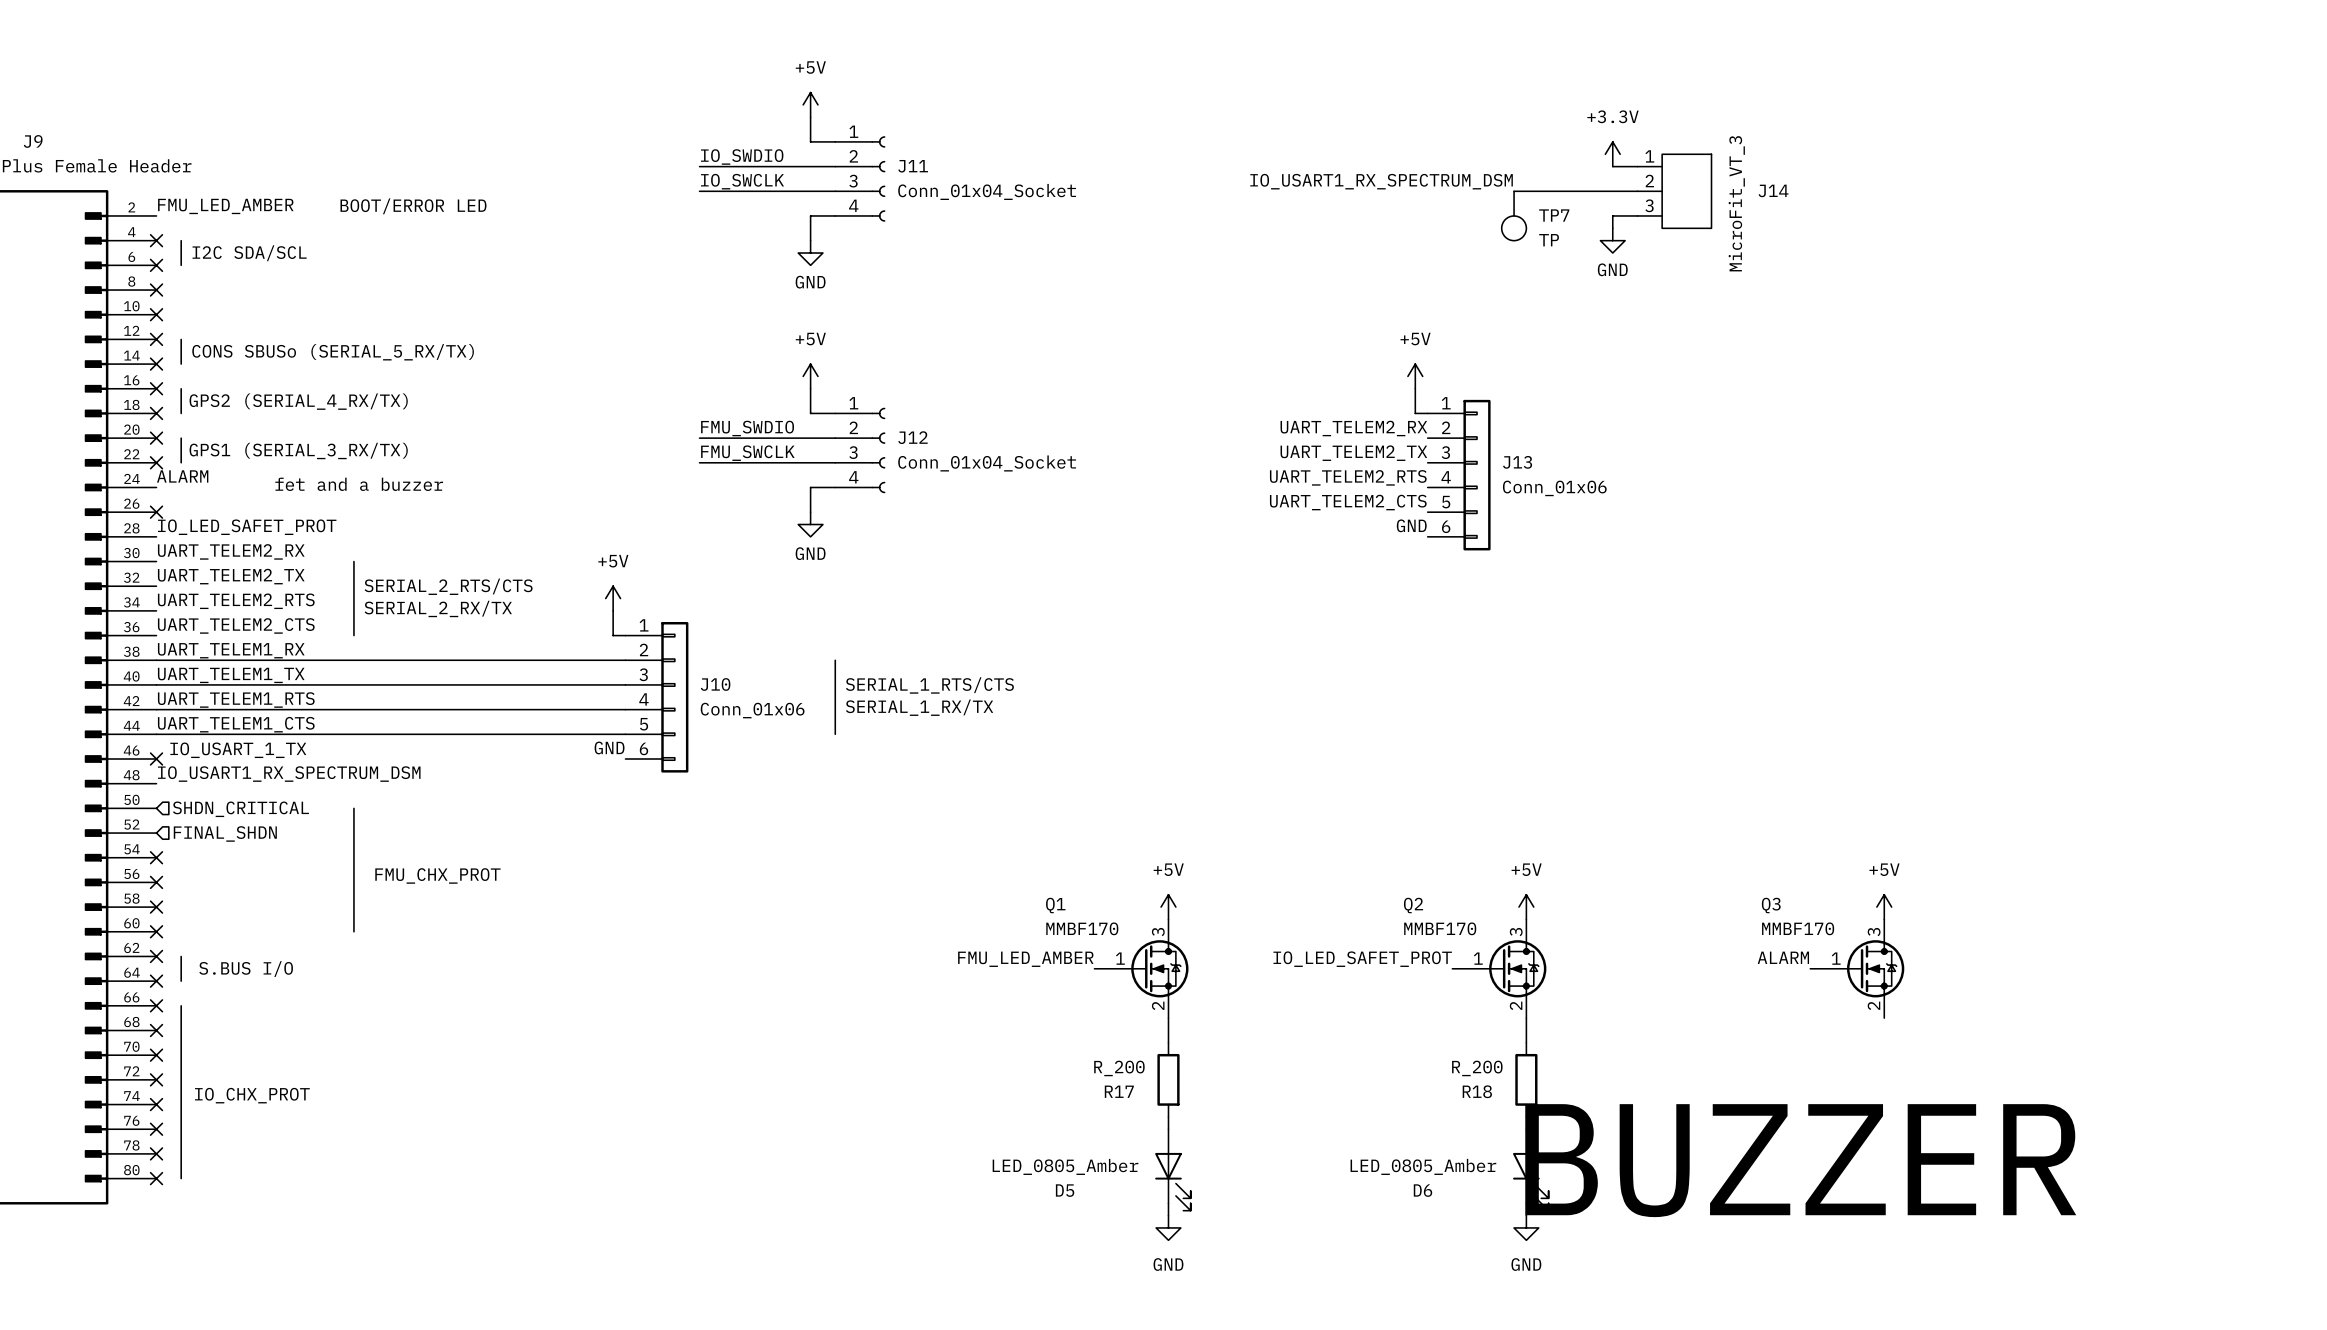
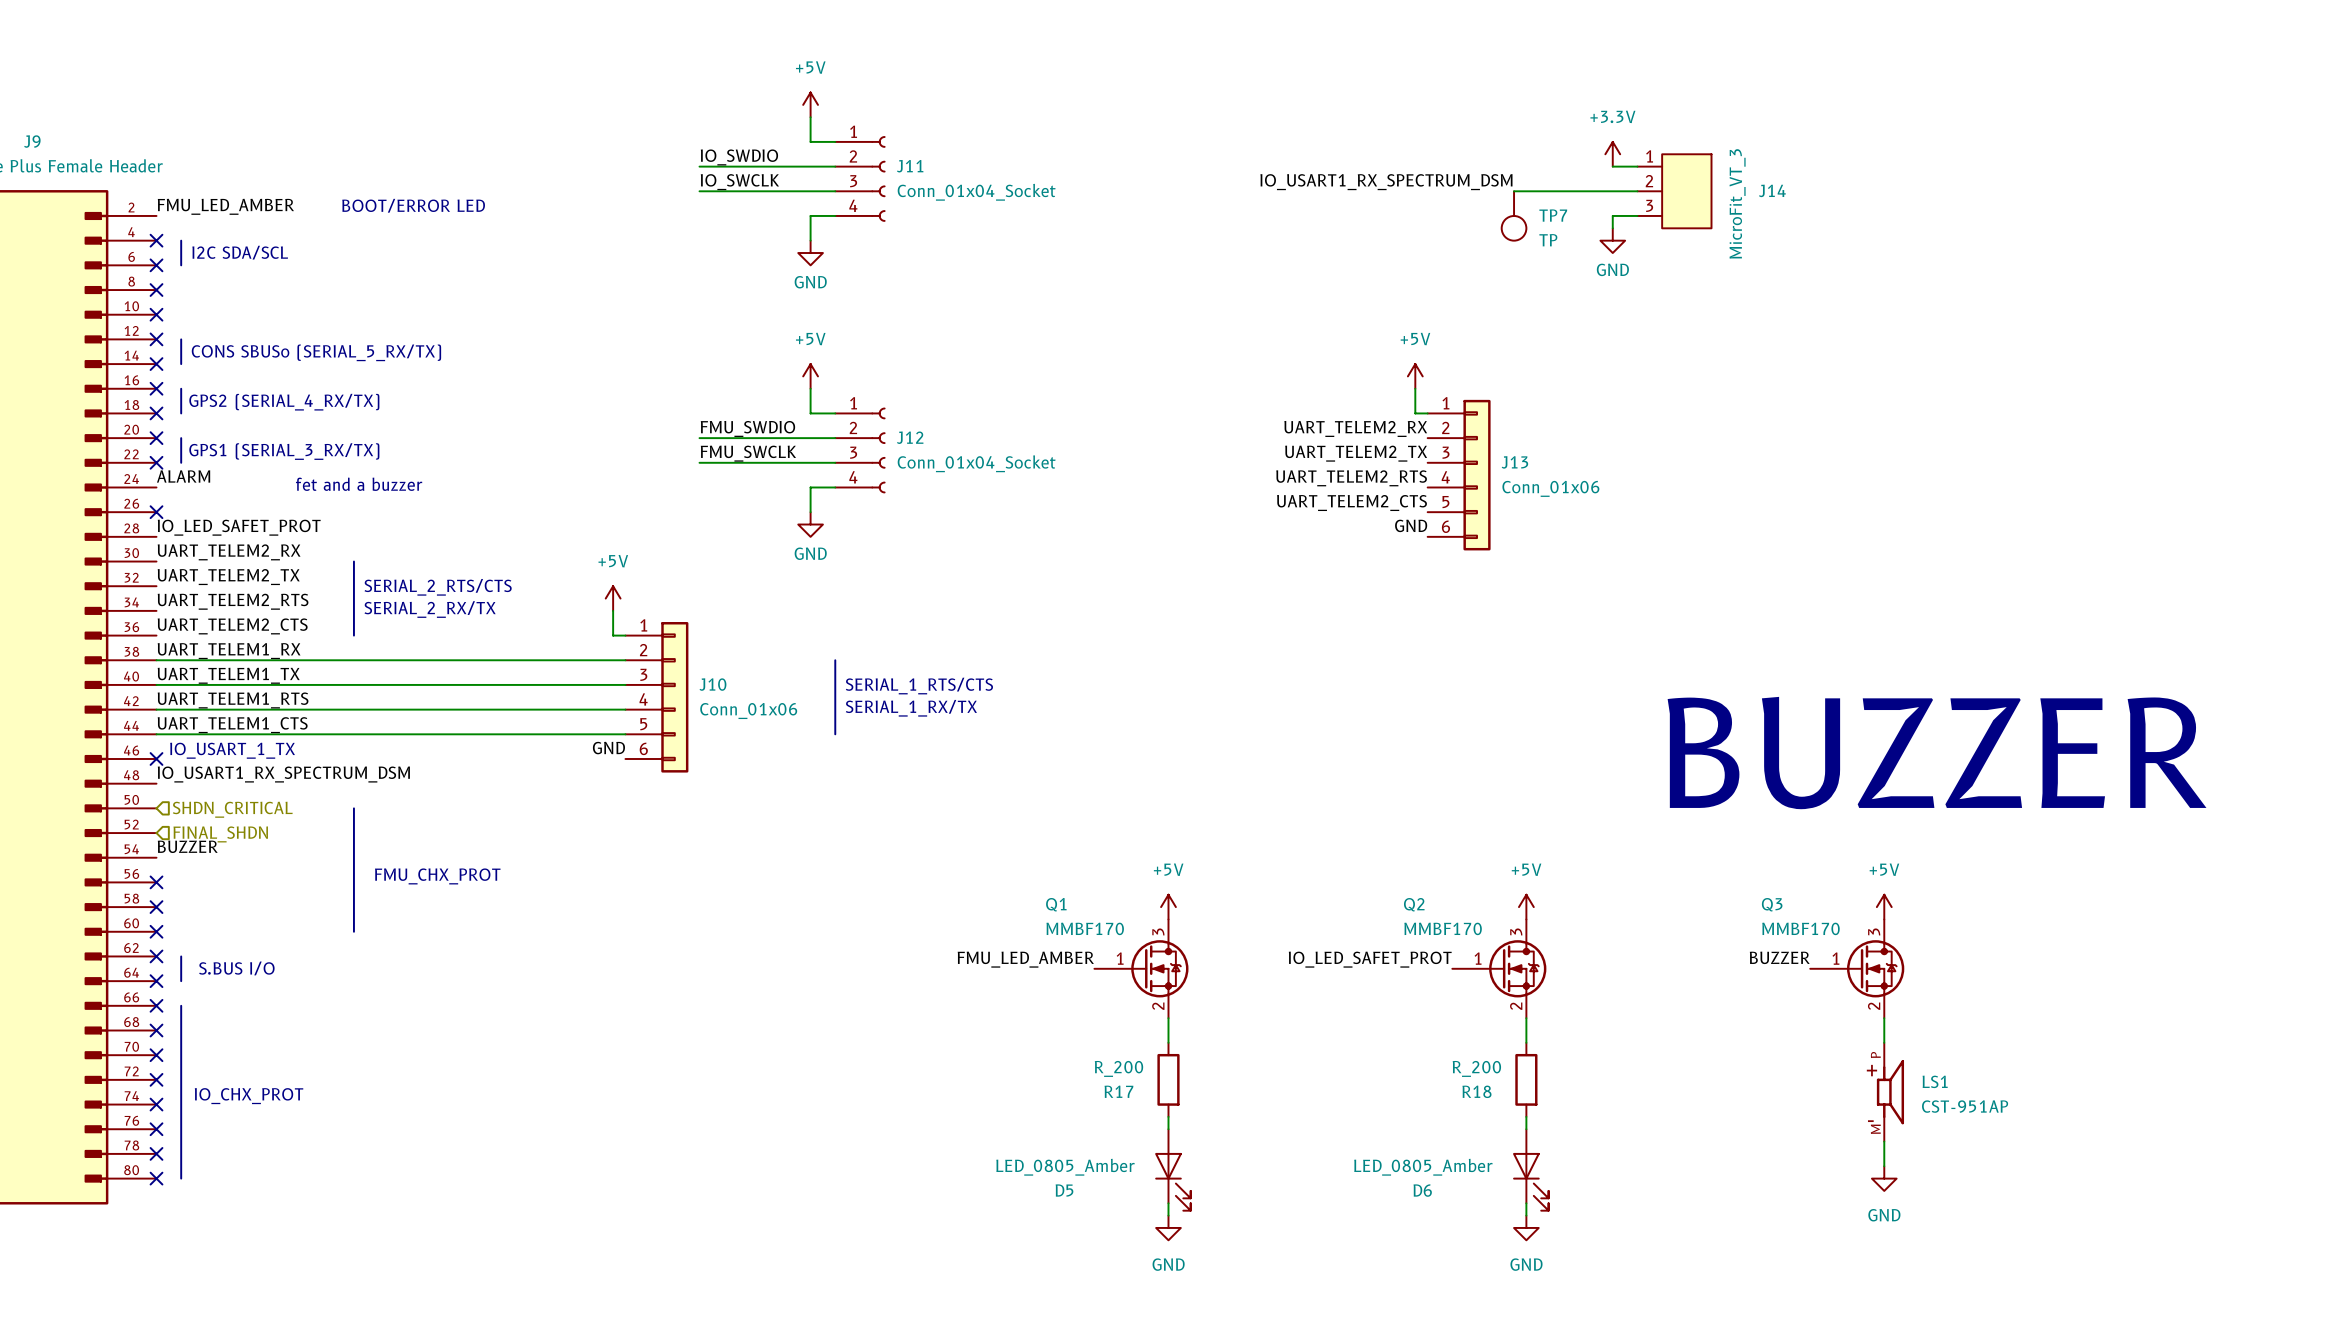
text: none -> BUZZER (1937, 753)
label: none -> BUZZER (187, 846)
no-connect mark: (156, 857) -> none
label: ALARM (1783, 957) -> BUZZER (1779, 957)
wire: none -> (1884, 1018) (1884, 1042)
LS1: none -> CST-951AP (1890, 1092)
wire: none -> (1884, 1141) (1884, 1166)
text: BUZZER (1800, 1160) -> none
power symbol: none -> GND (1884, 1178)

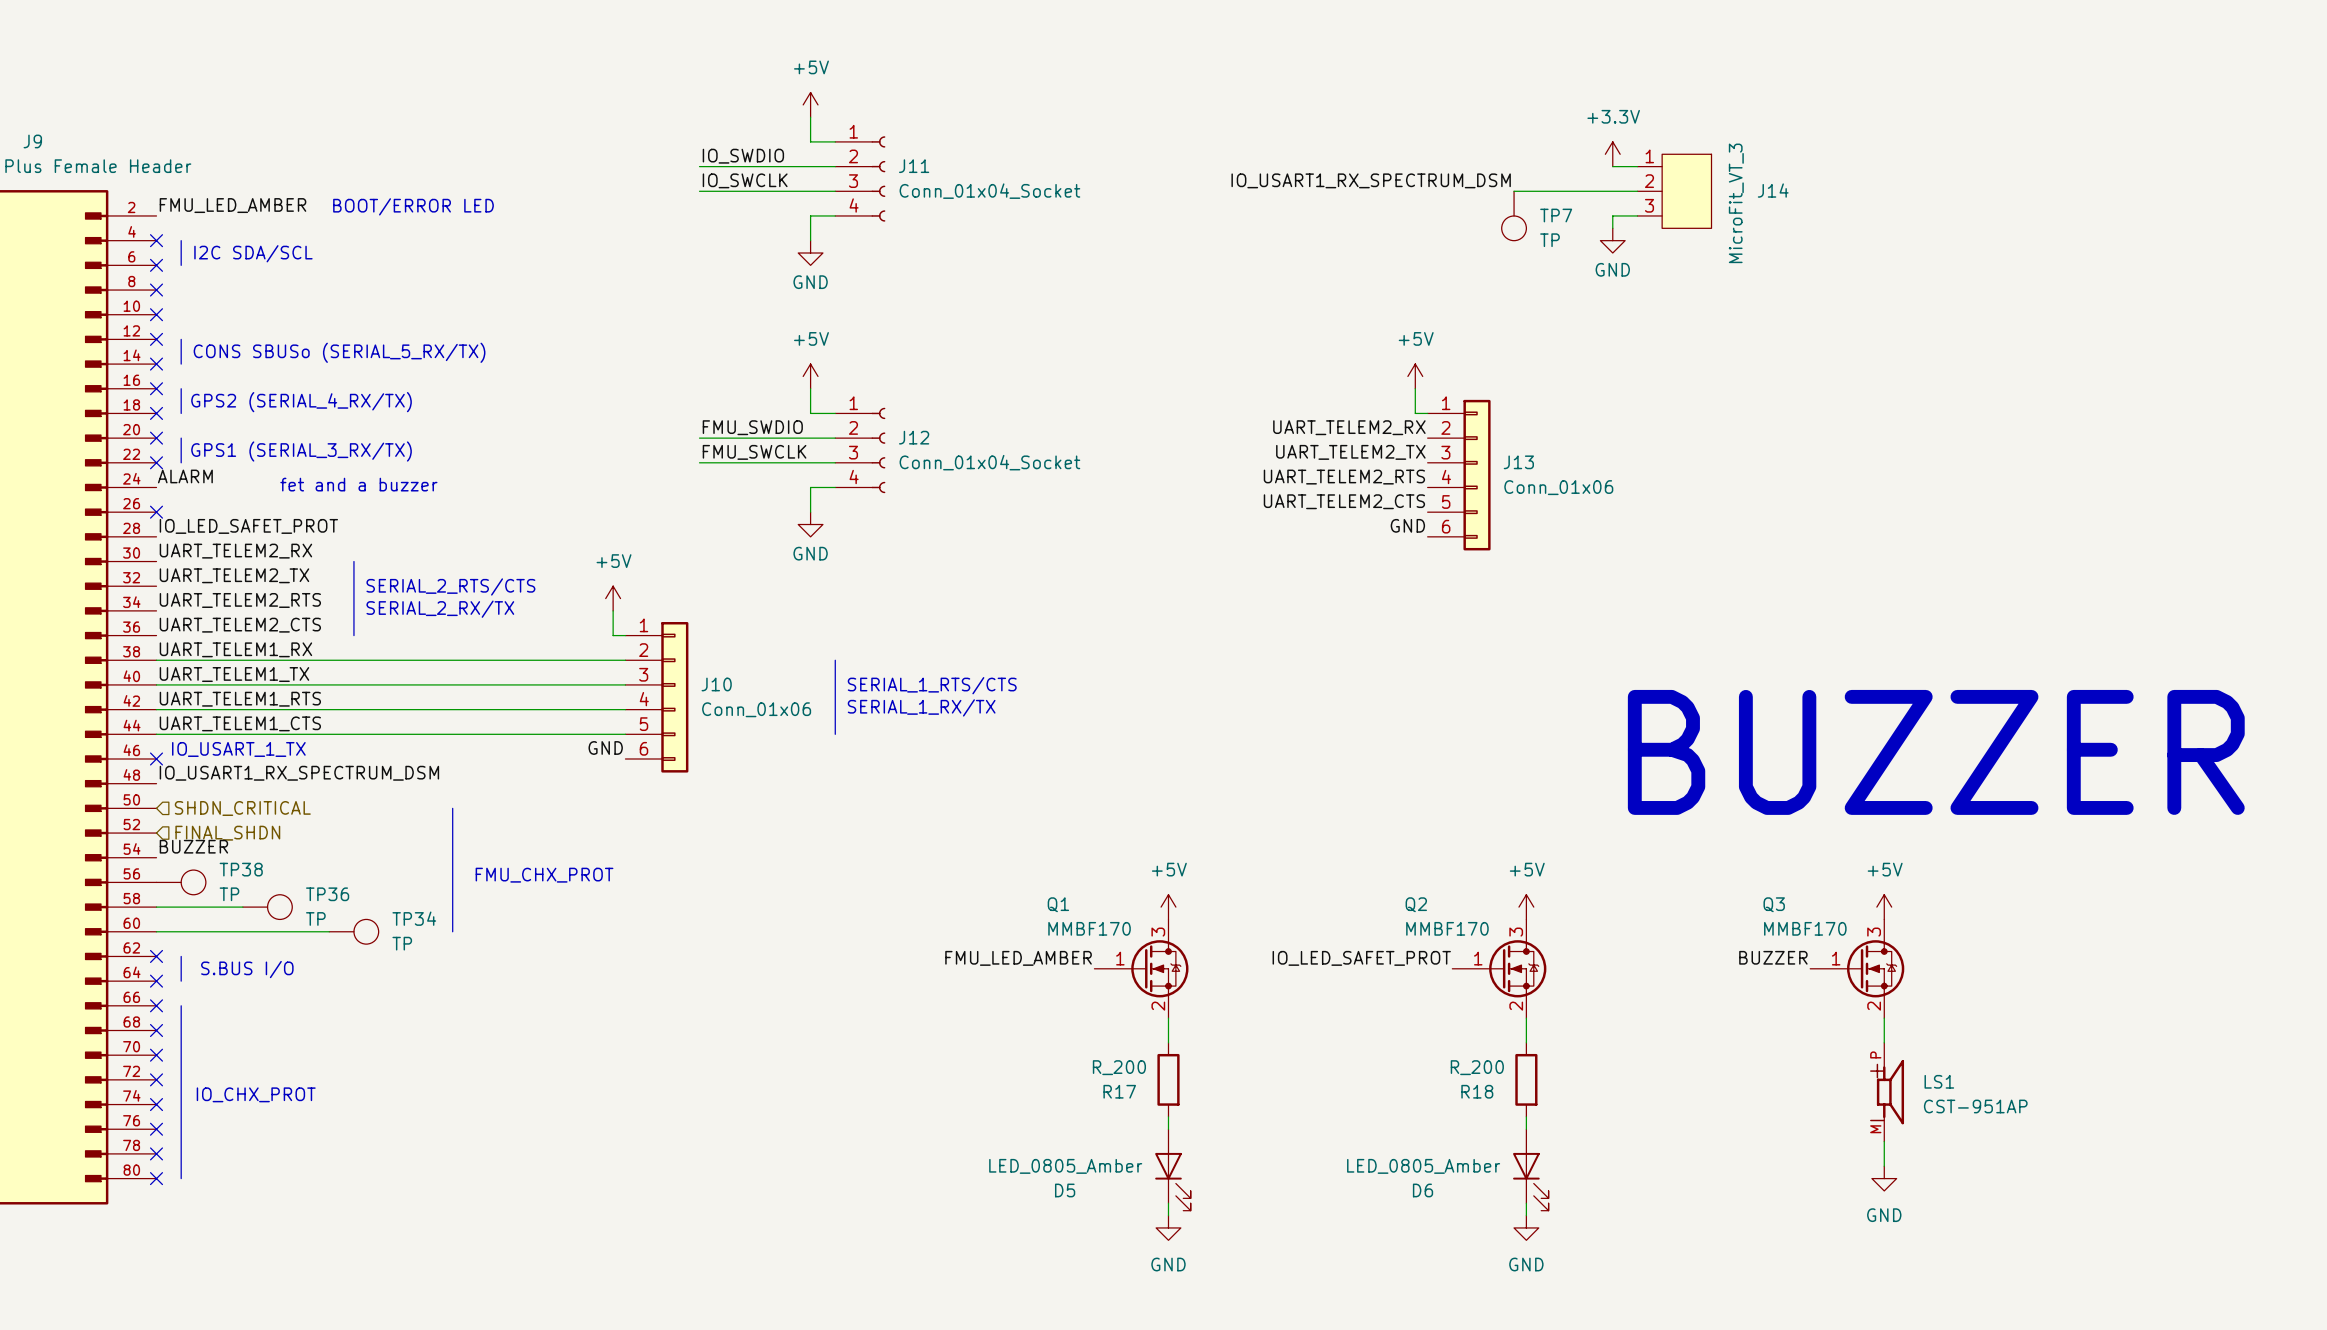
bus: (353, 808) (353, 931) -> (452, 808) (452, 931)
text position: FMU_CHX_PROT (437, 876) -> FMU_CHX_PROT (544, 875)
no-connect mark: (156, 882) -> none
TP38: none -> TP (181, 882)
wire: none -> (156, 907) (242, 907)
no-connect mark: (156, 907) -> none
TP36: none -> TP (267, 907)
wire: none -> (156, 931) (329, 931)
no-connect mark: (156, 931) -> none
TP34: none -> TP (353, 931)

